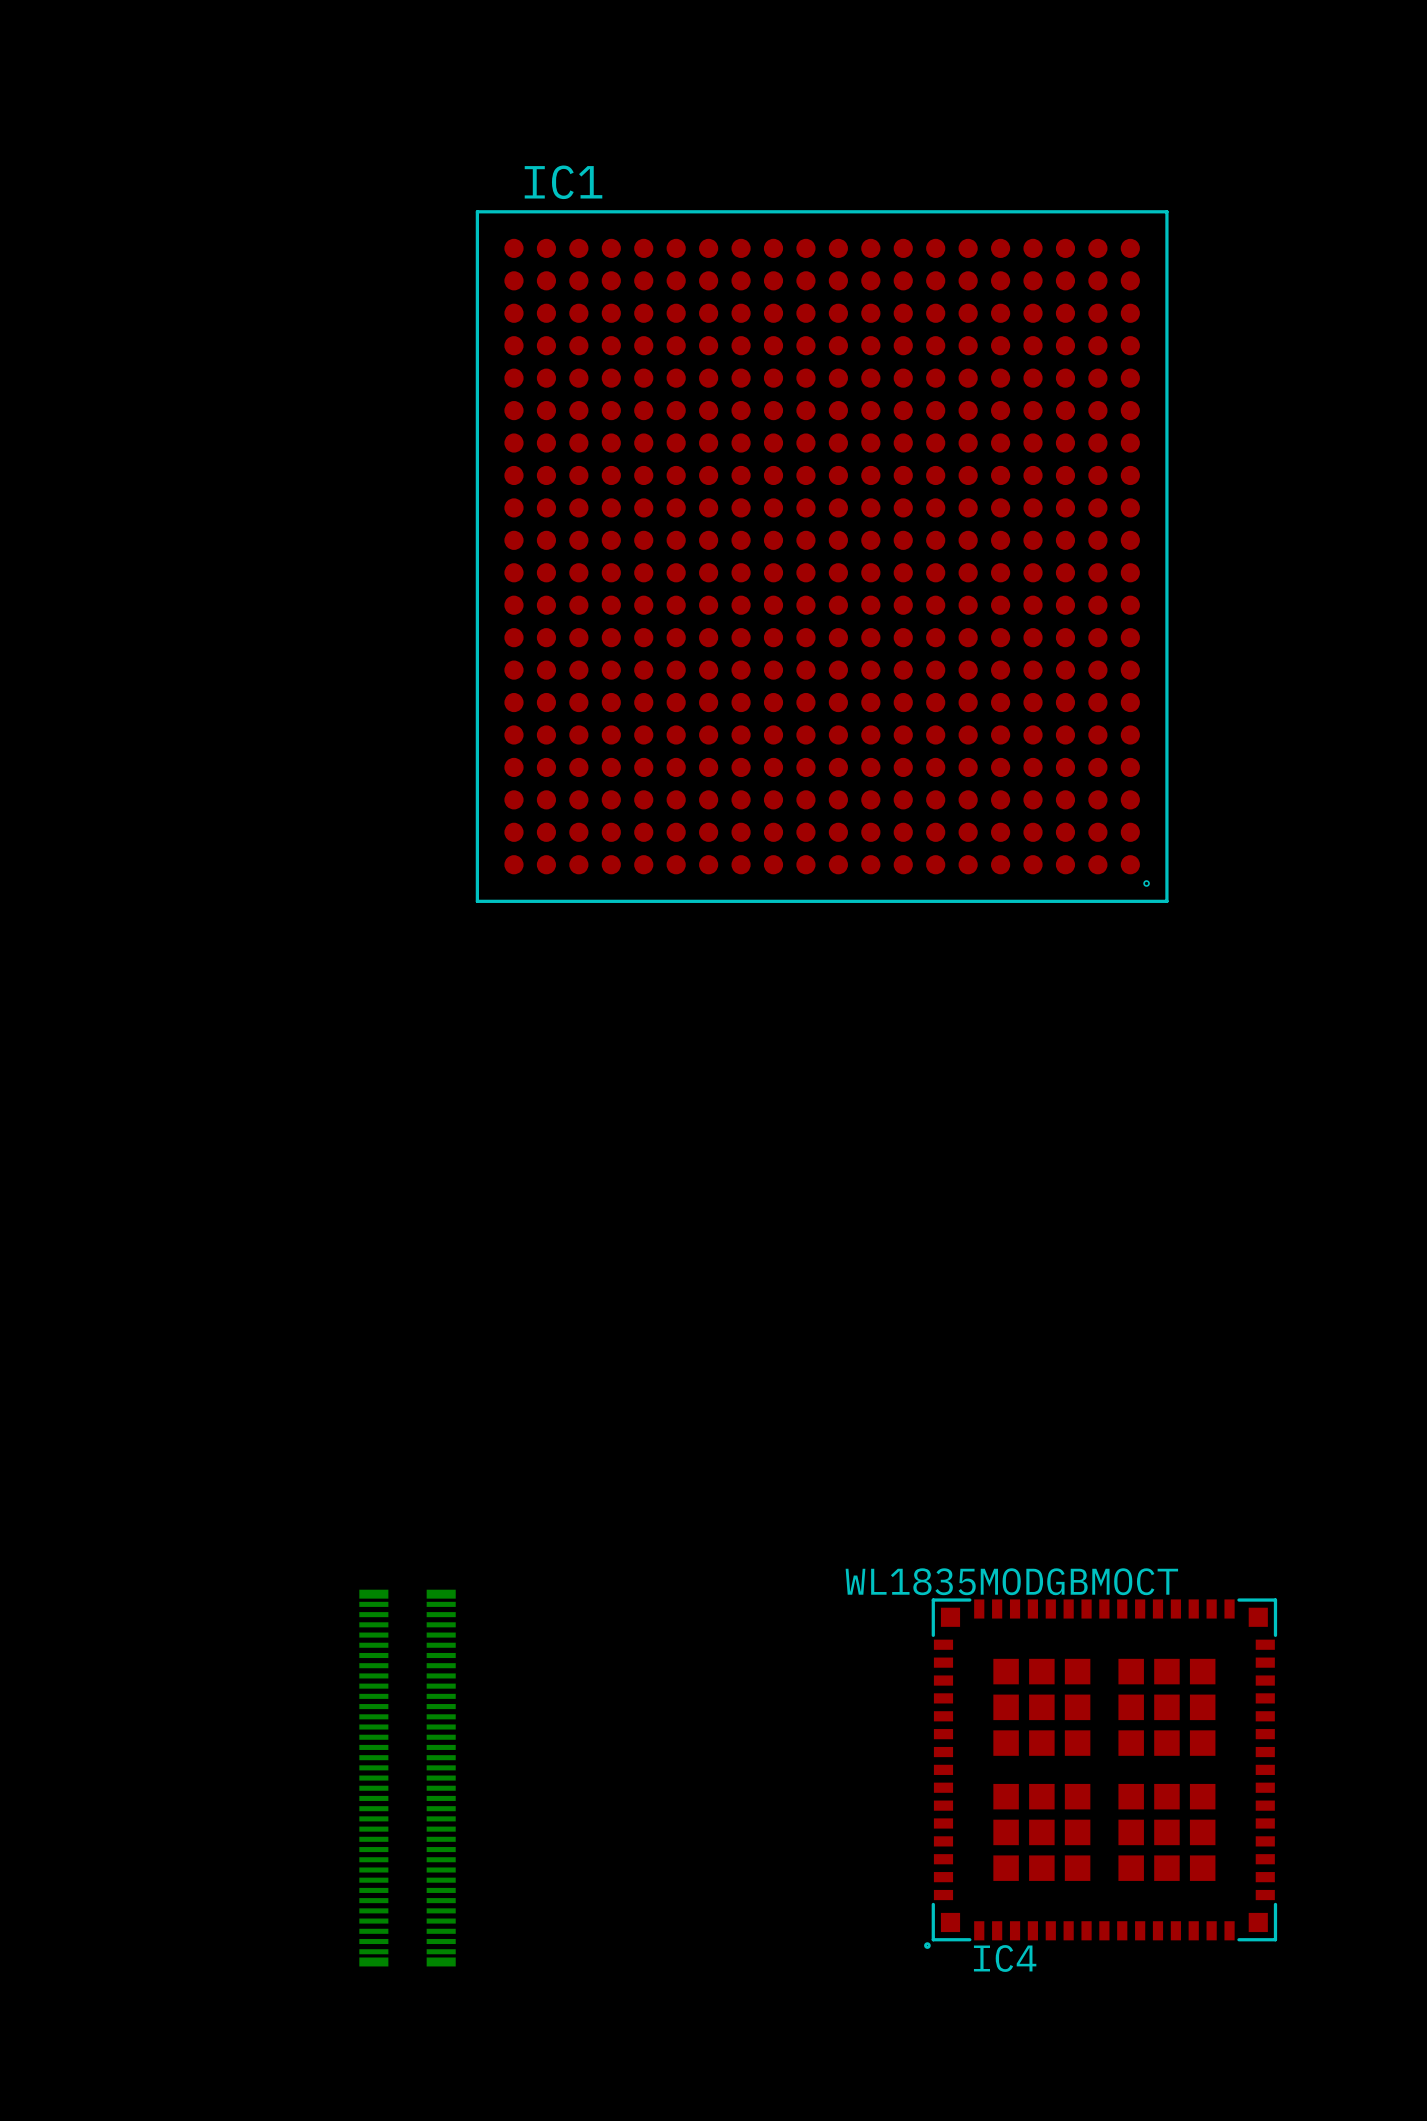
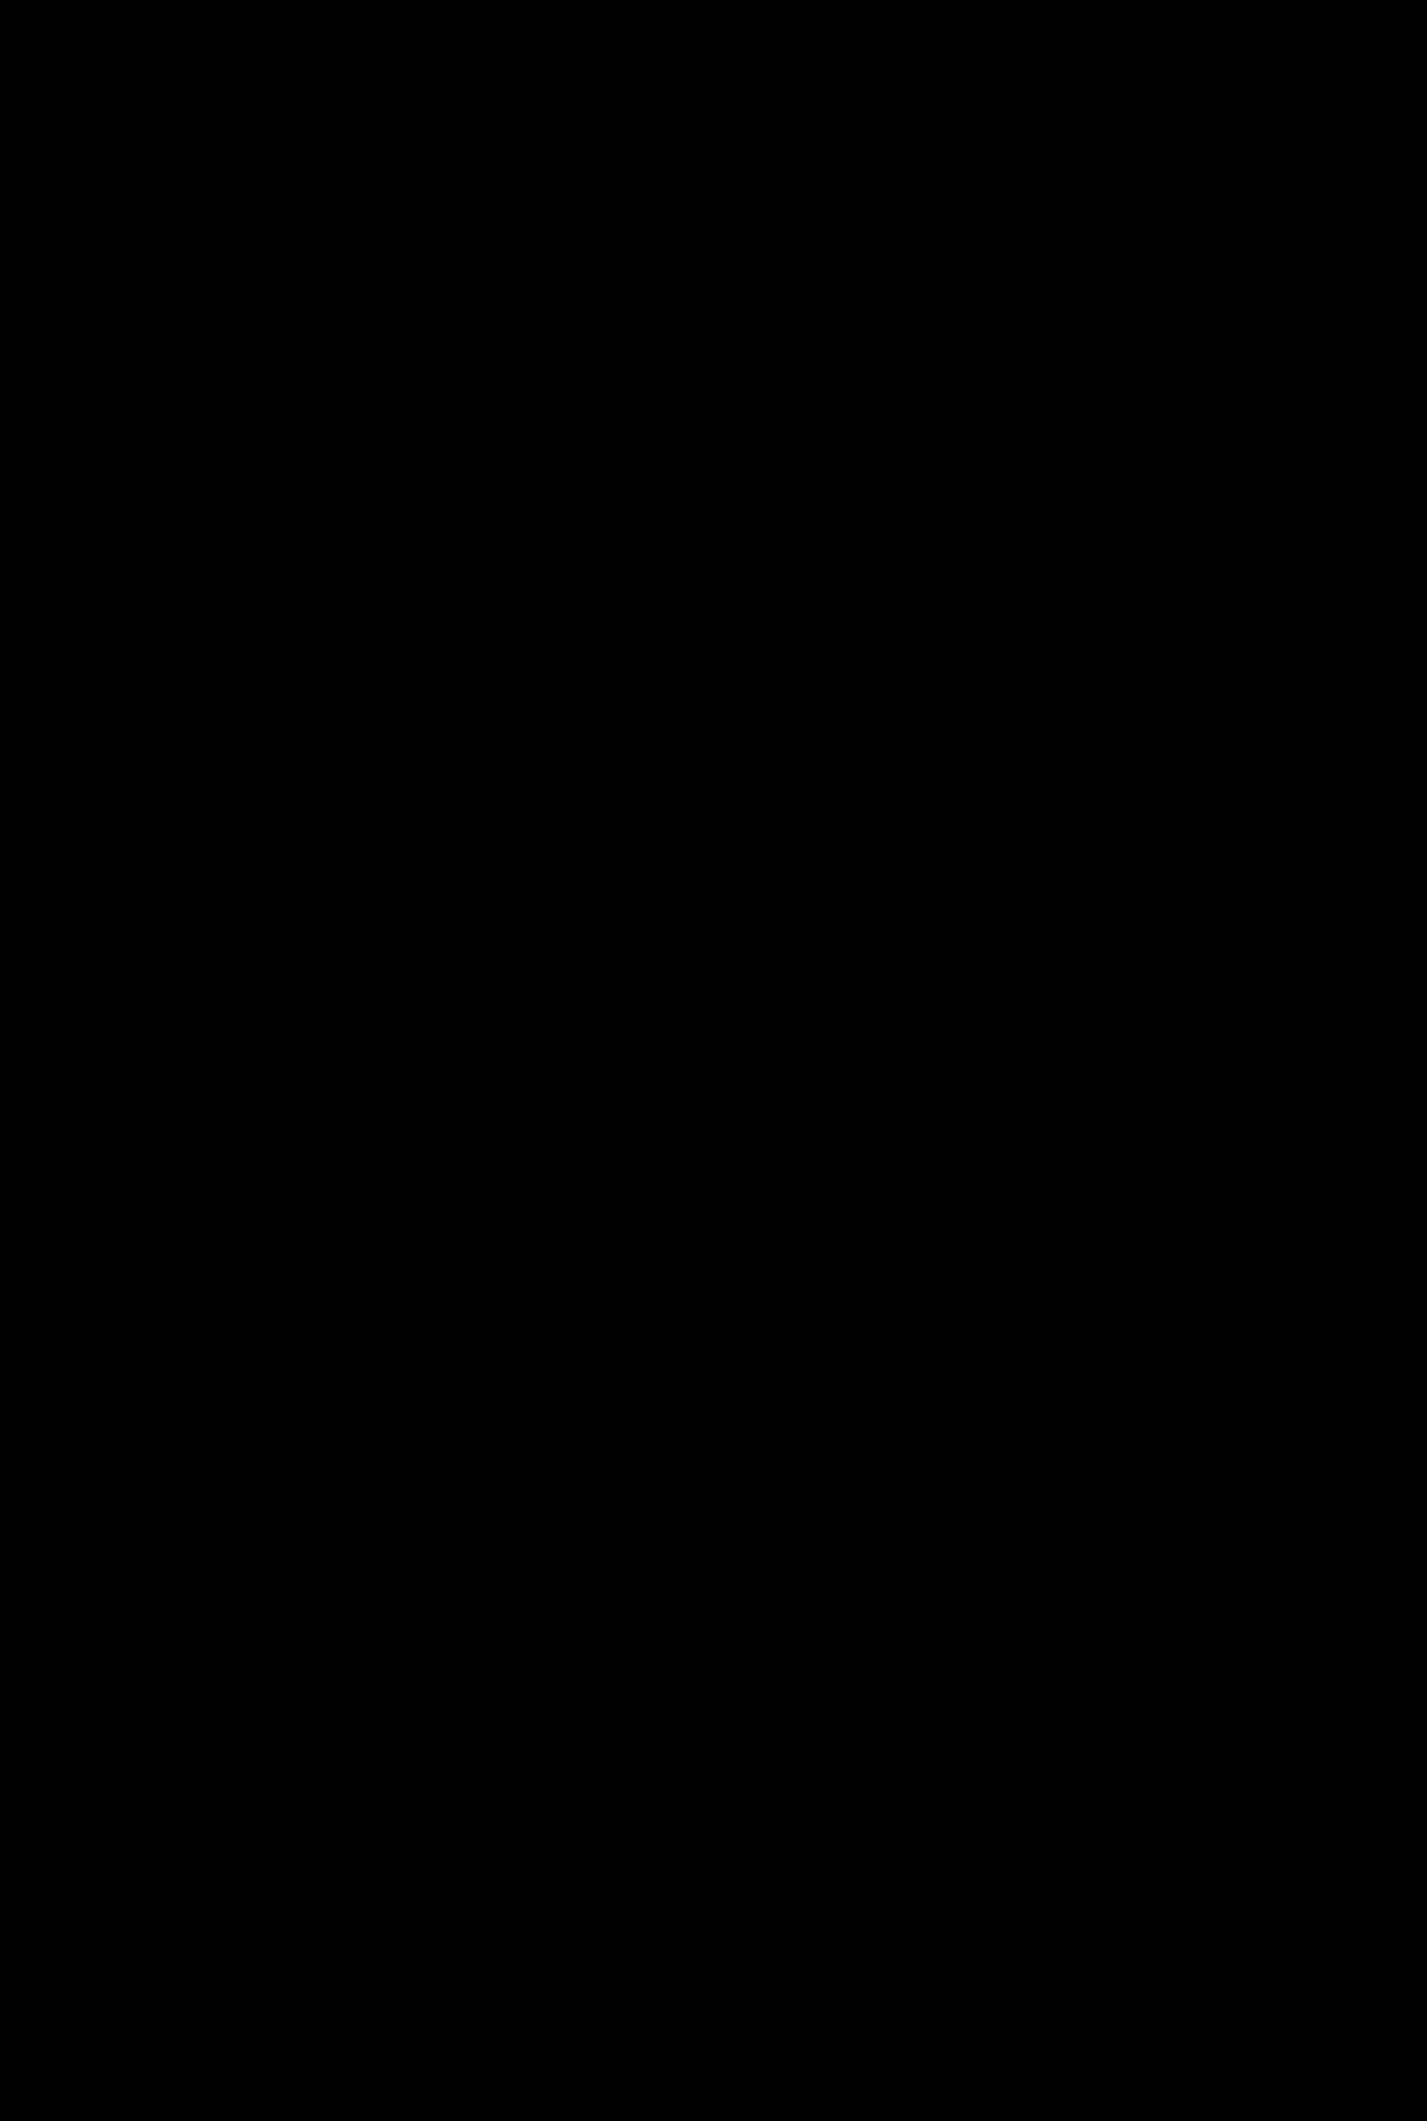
IC1: (822, 556) -> none
IC4: WL1835MODGBMOCT (1100, 1773) -> none
part: (407, 1778) -> none

